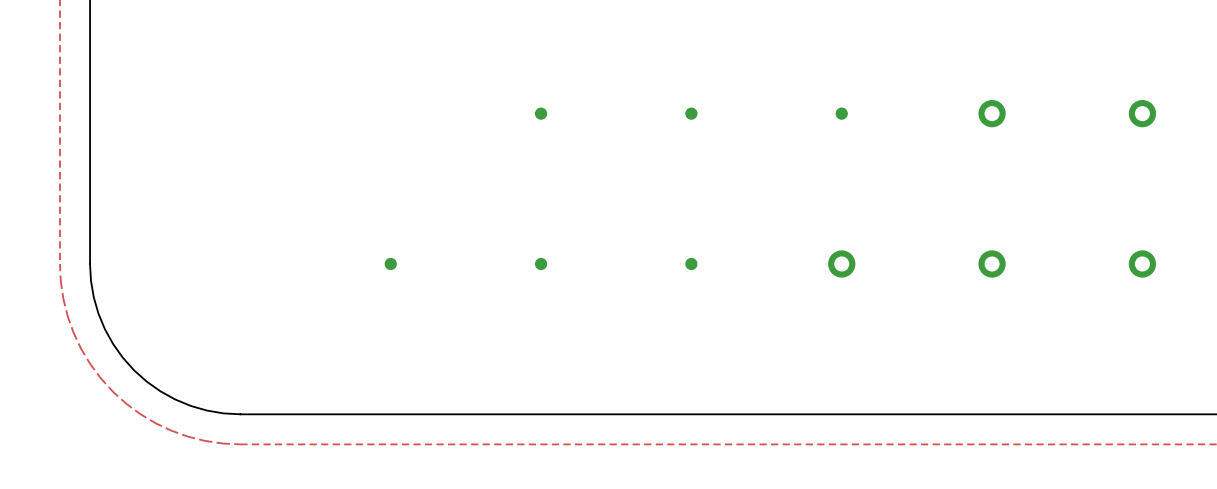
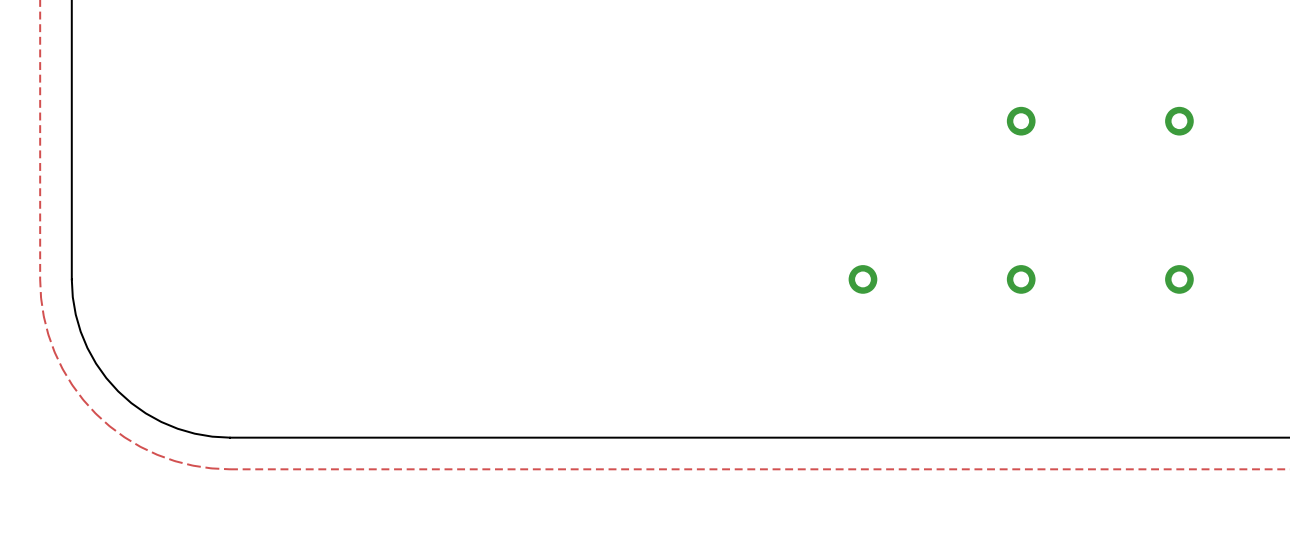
via: (541, 113) -> none
via: (691, 113) -> none
via: (841, 113) -> none
via: (390, 263) -> none
via: (541, 263) -> none
via: (691, 263) -> none

